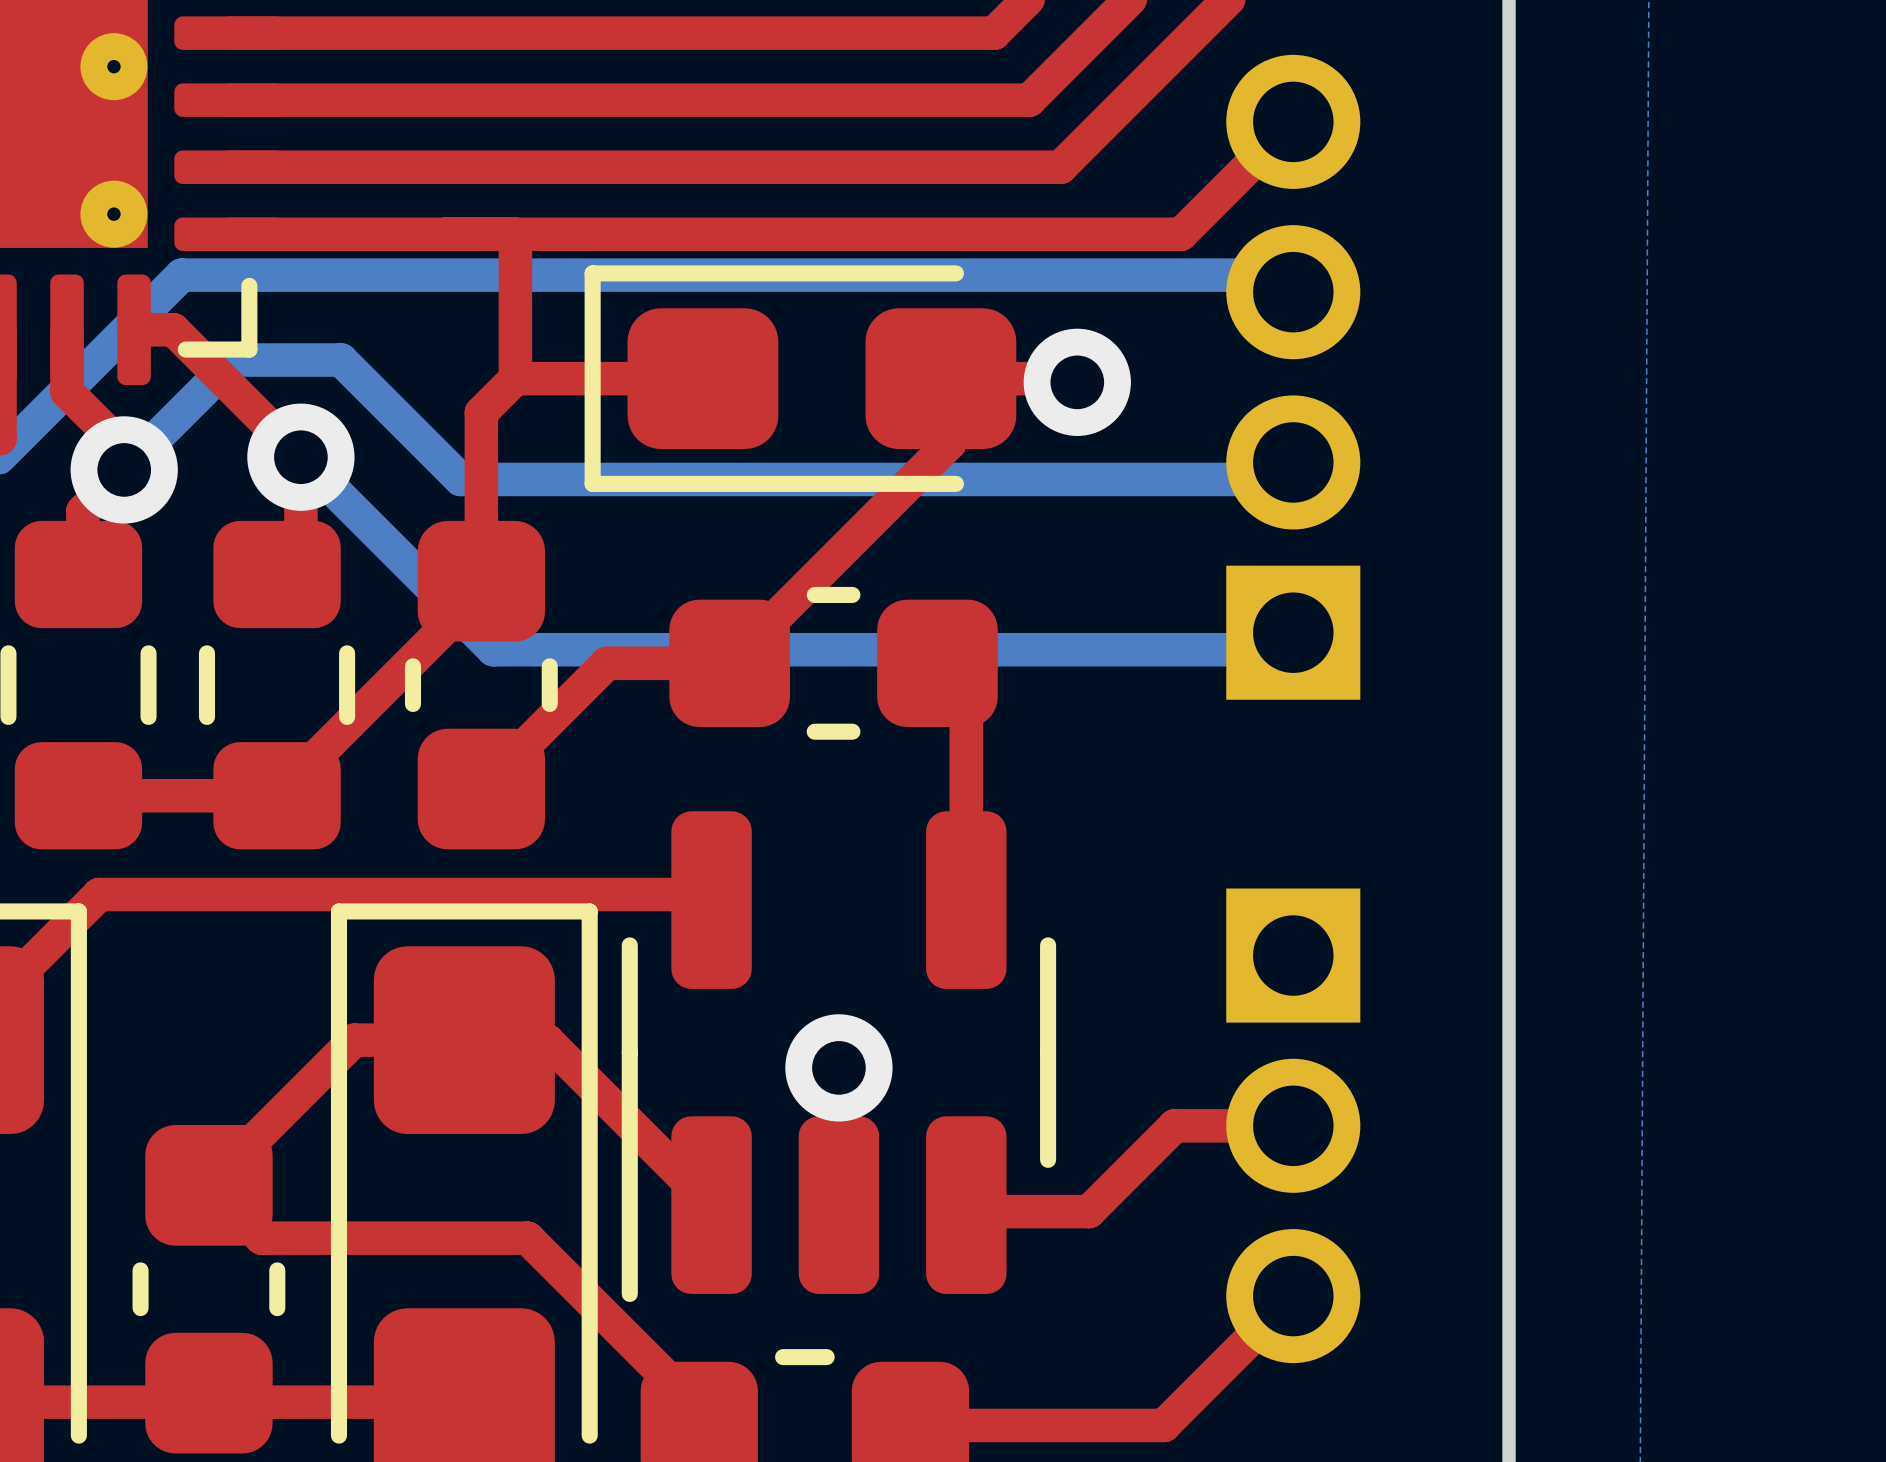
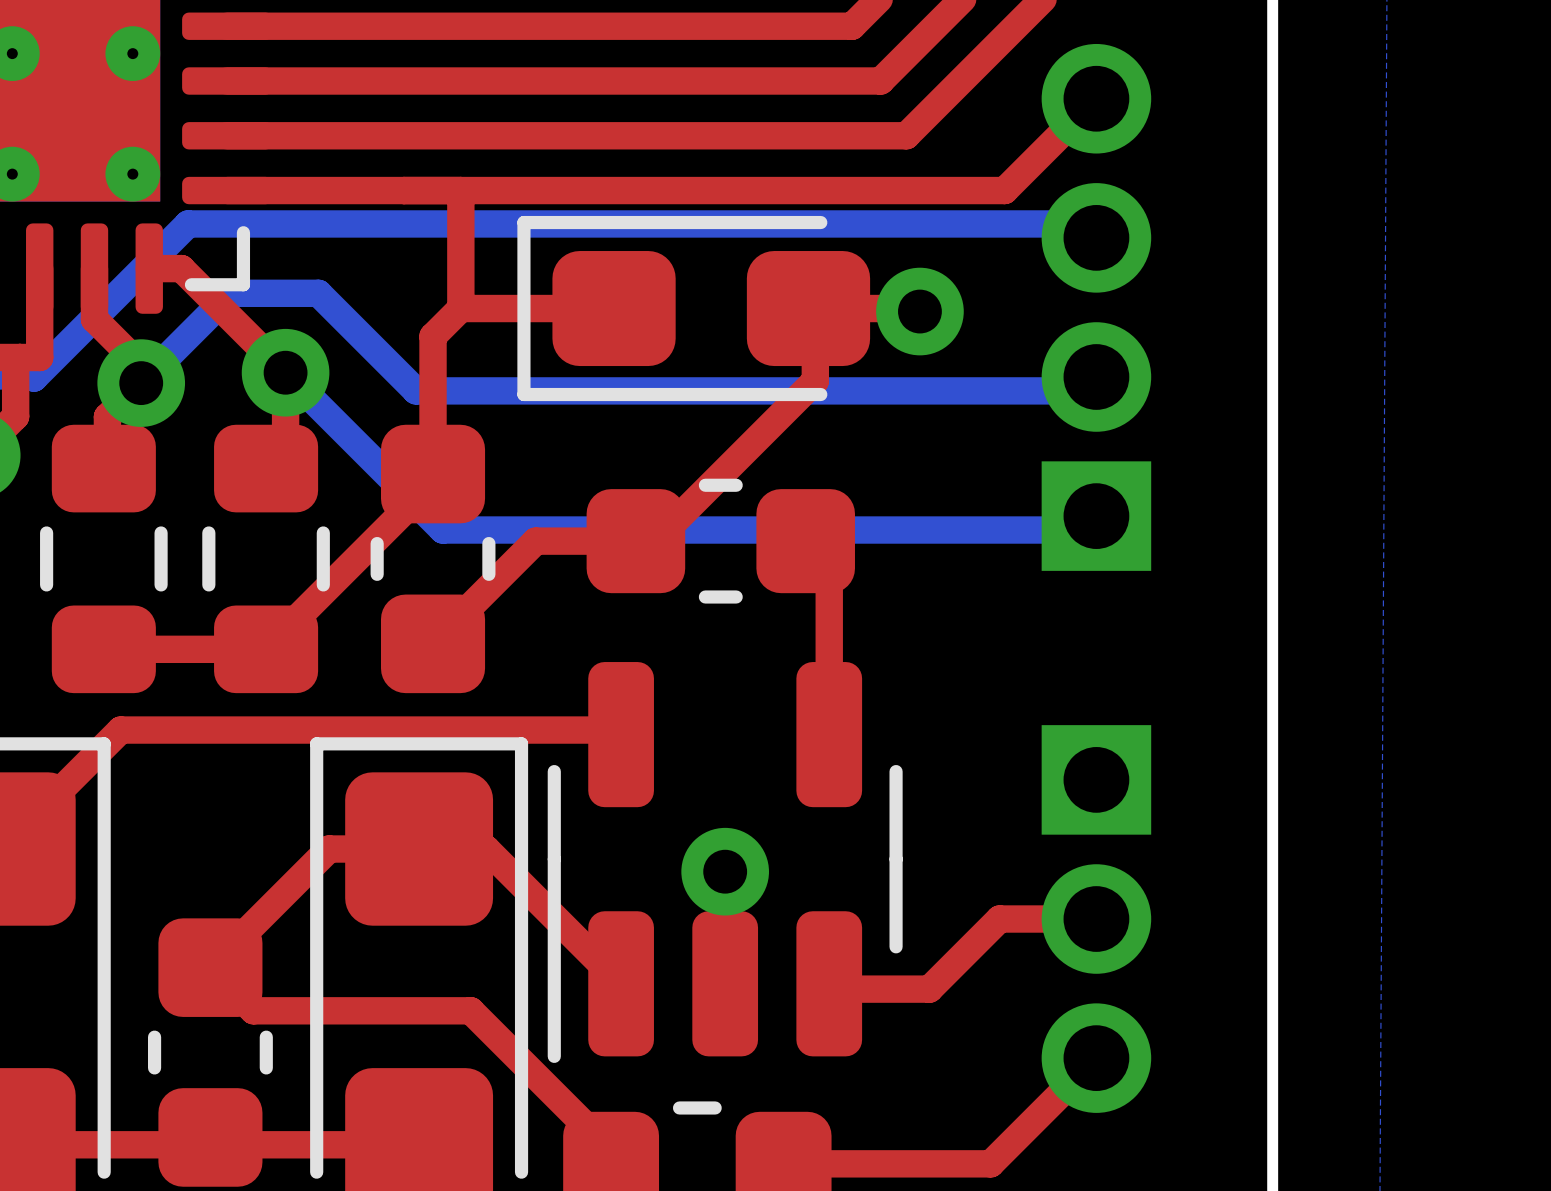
top track: (949, 443) (729, 663) -> (815, 361) (815, 380) (654, 541) (635, 541)

